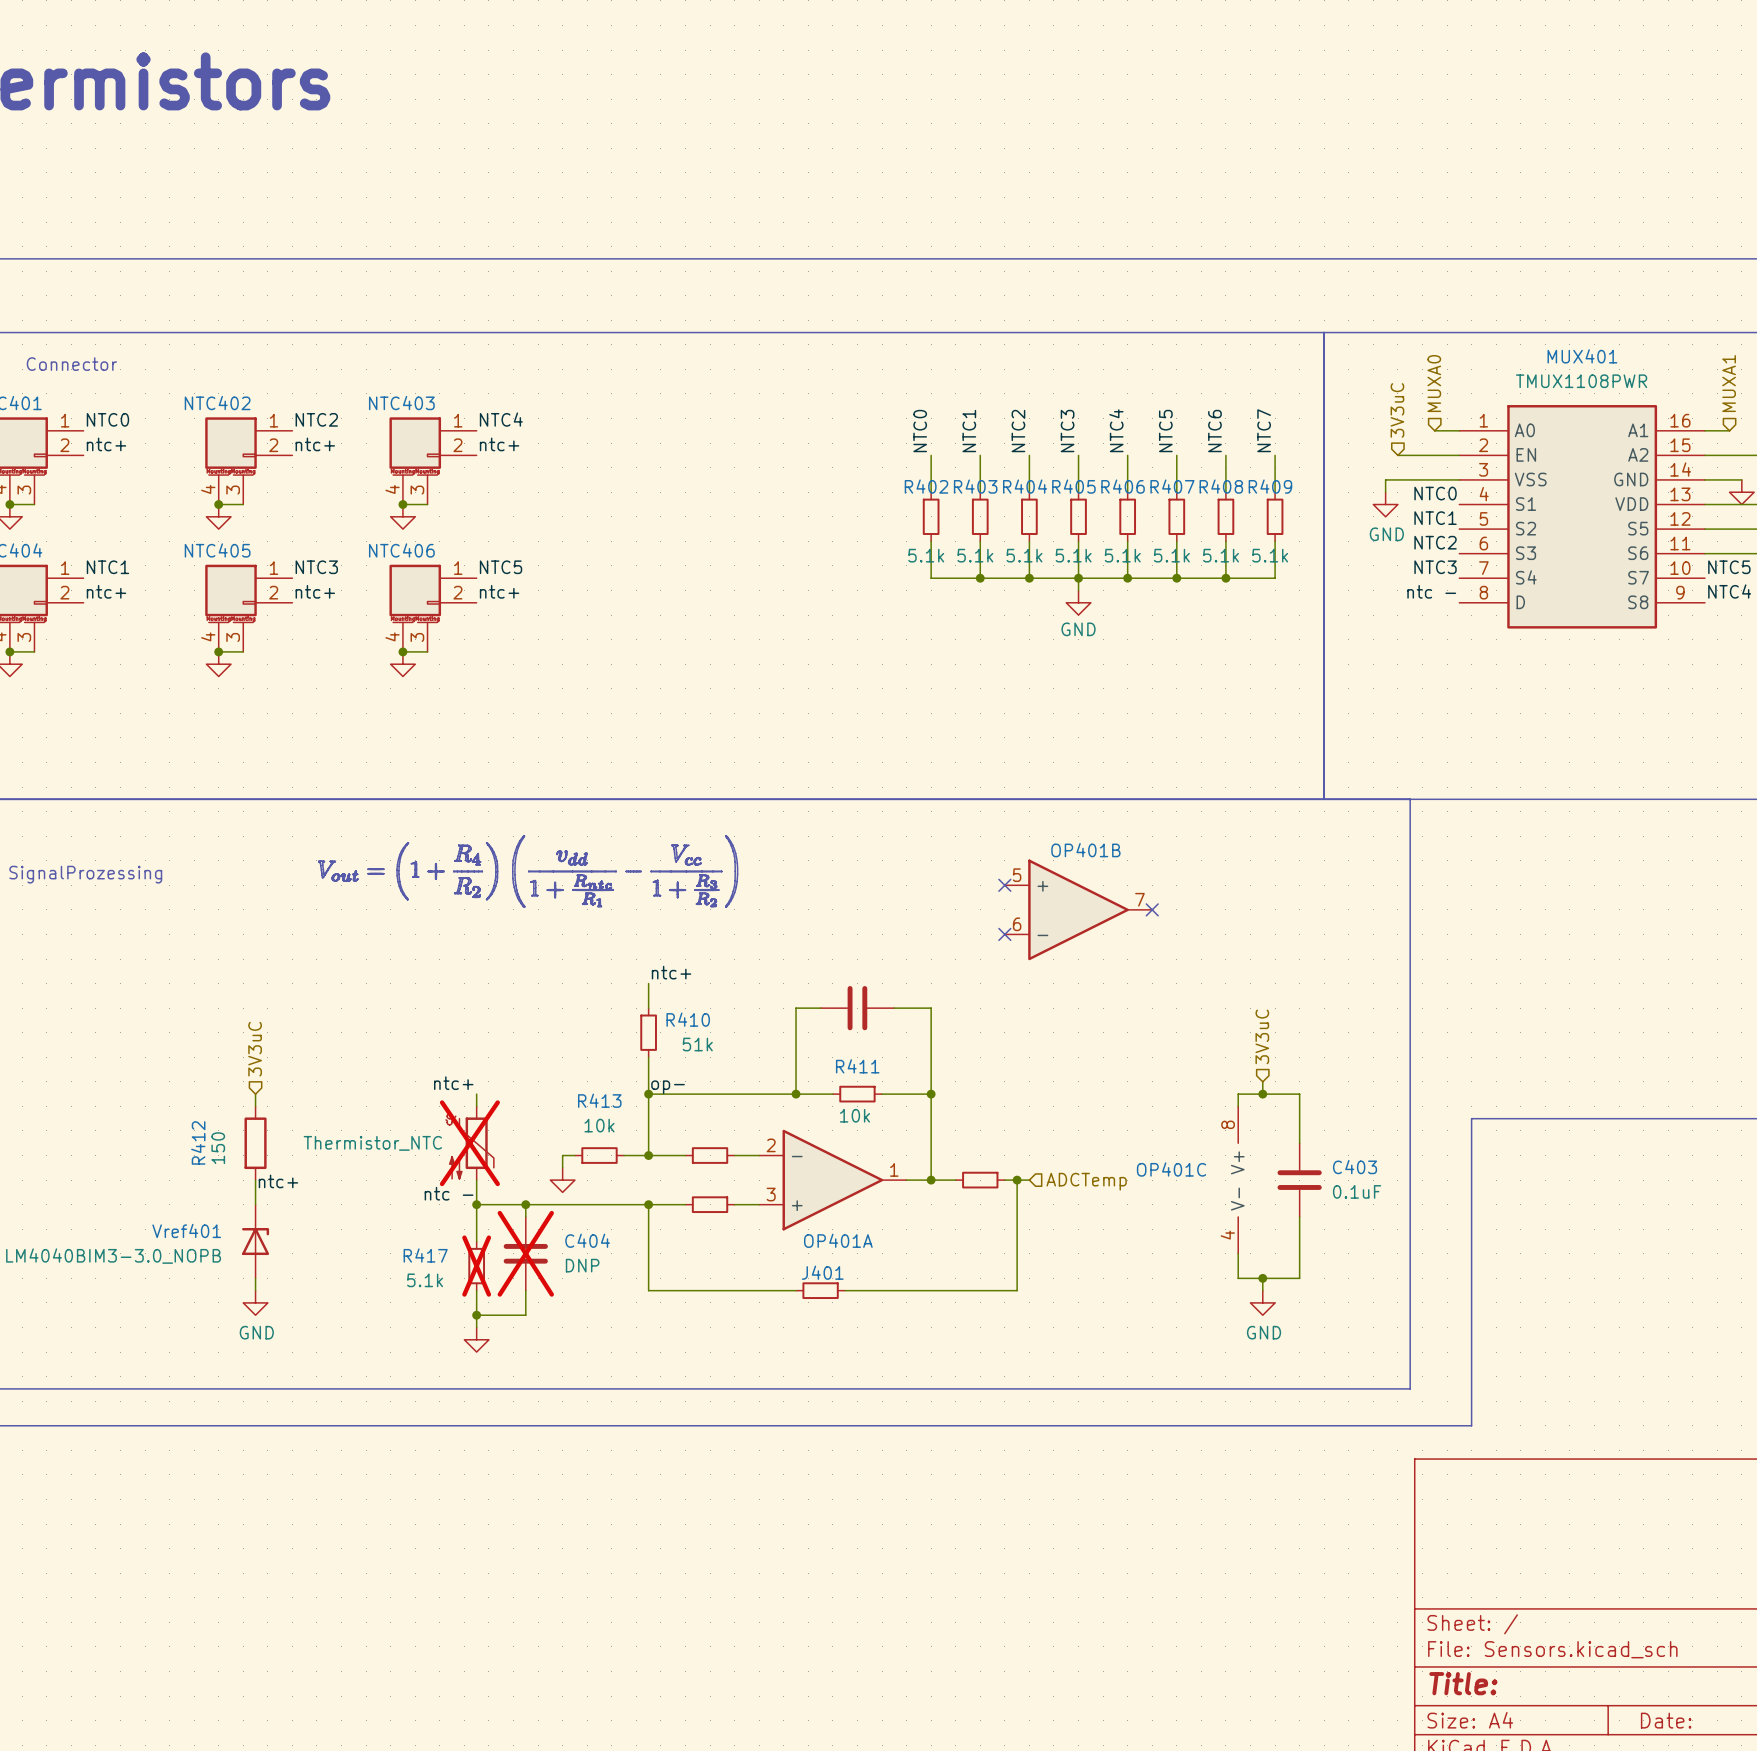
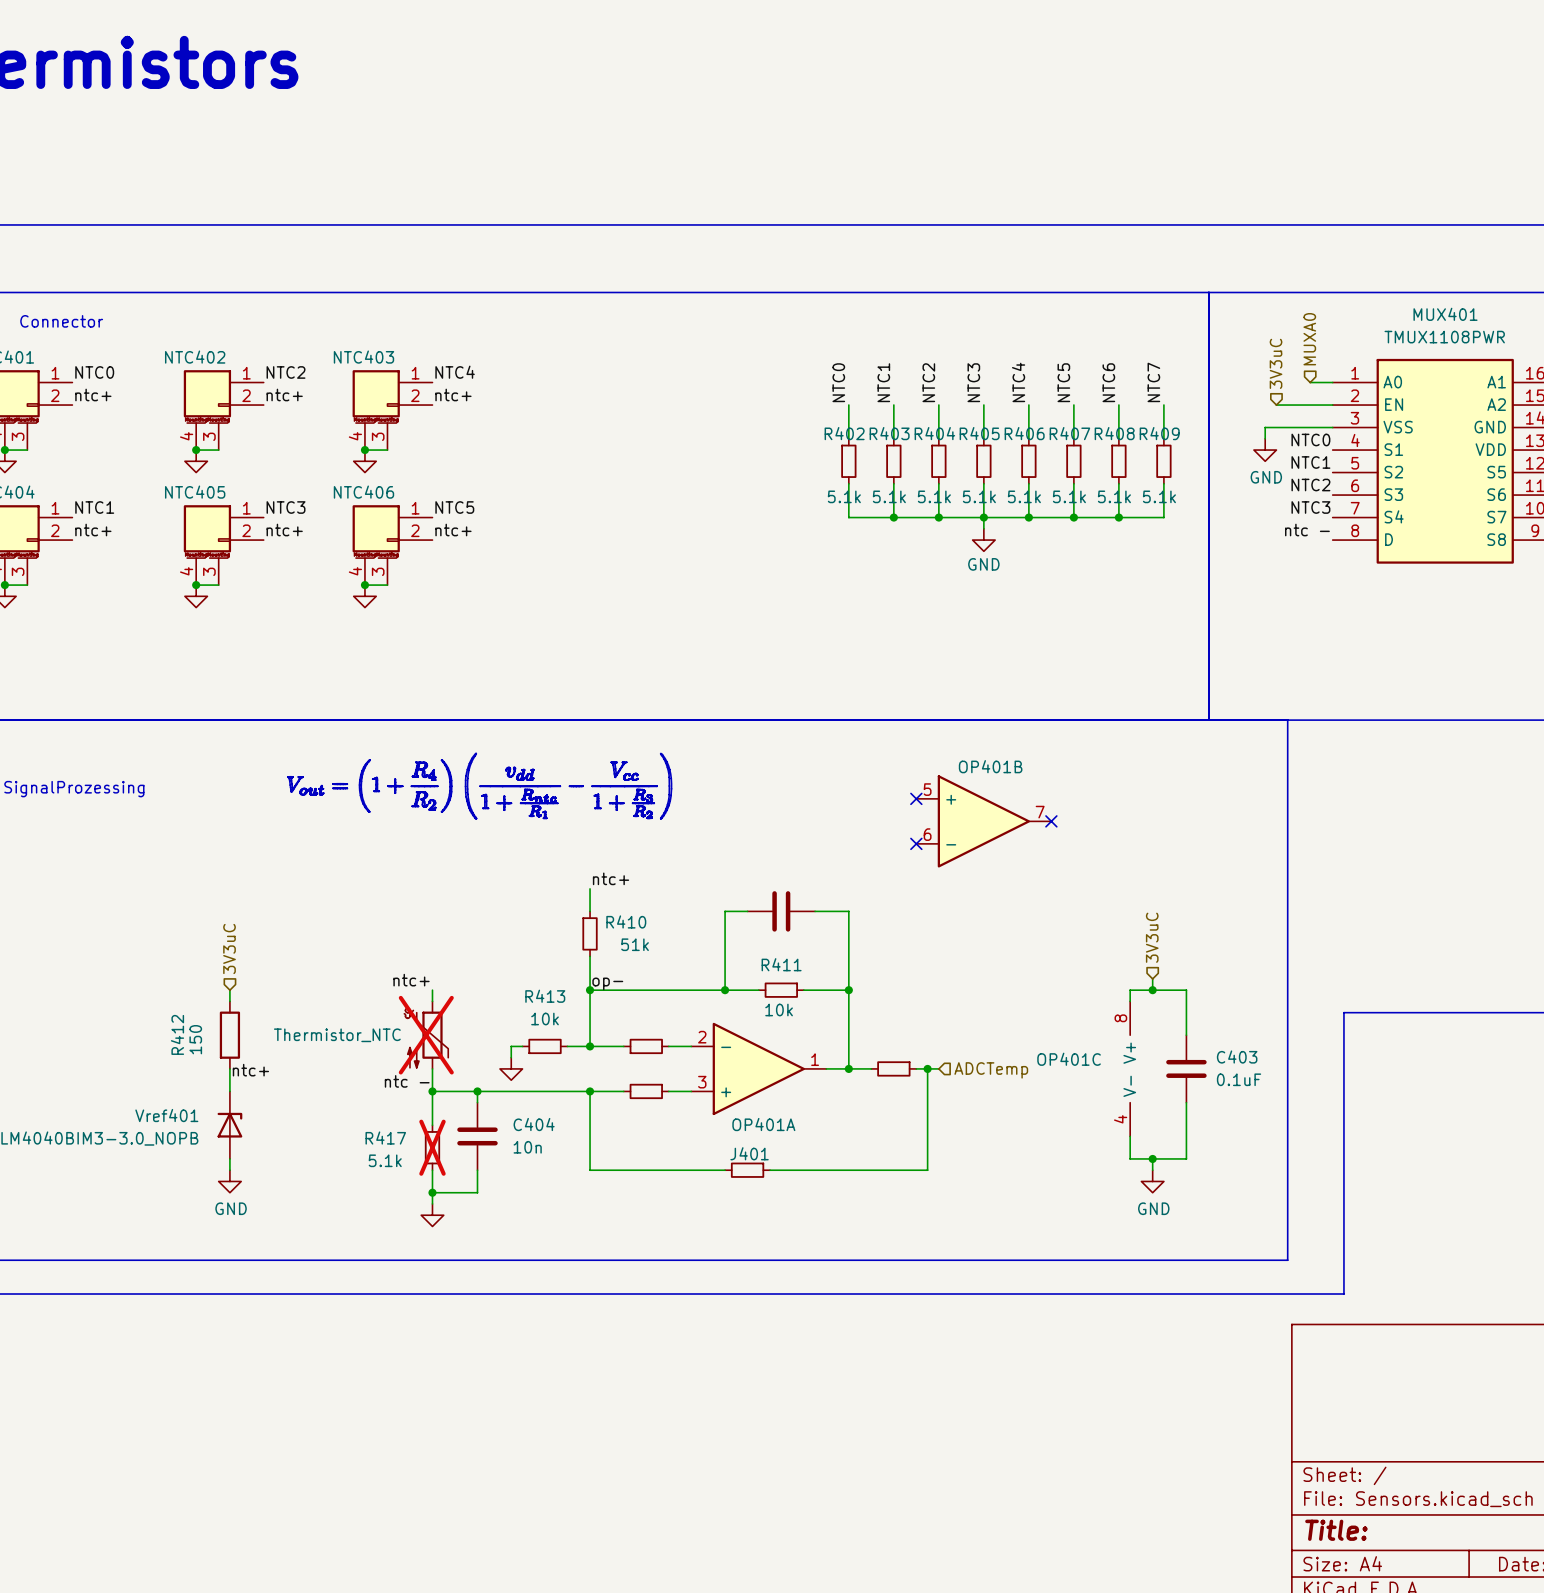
C404 do-not-place cross: (525, 1253) -> none
C404 value: DNP (582, 1265) -> 10n (527, 1147)

